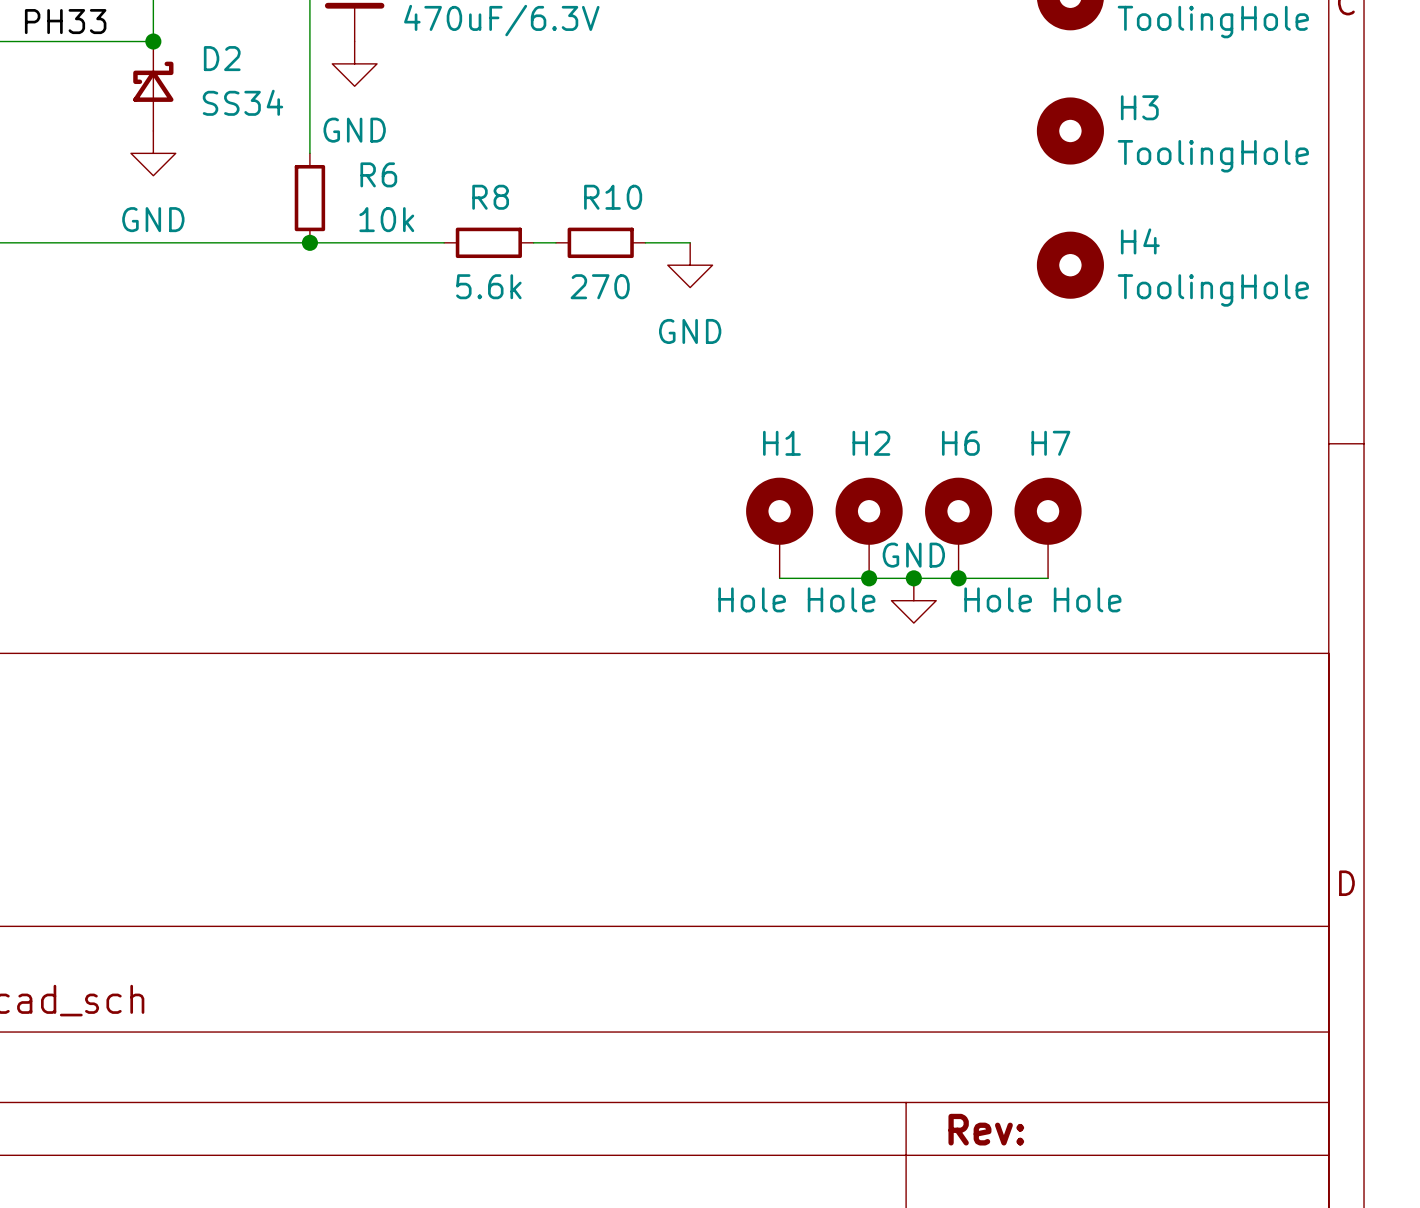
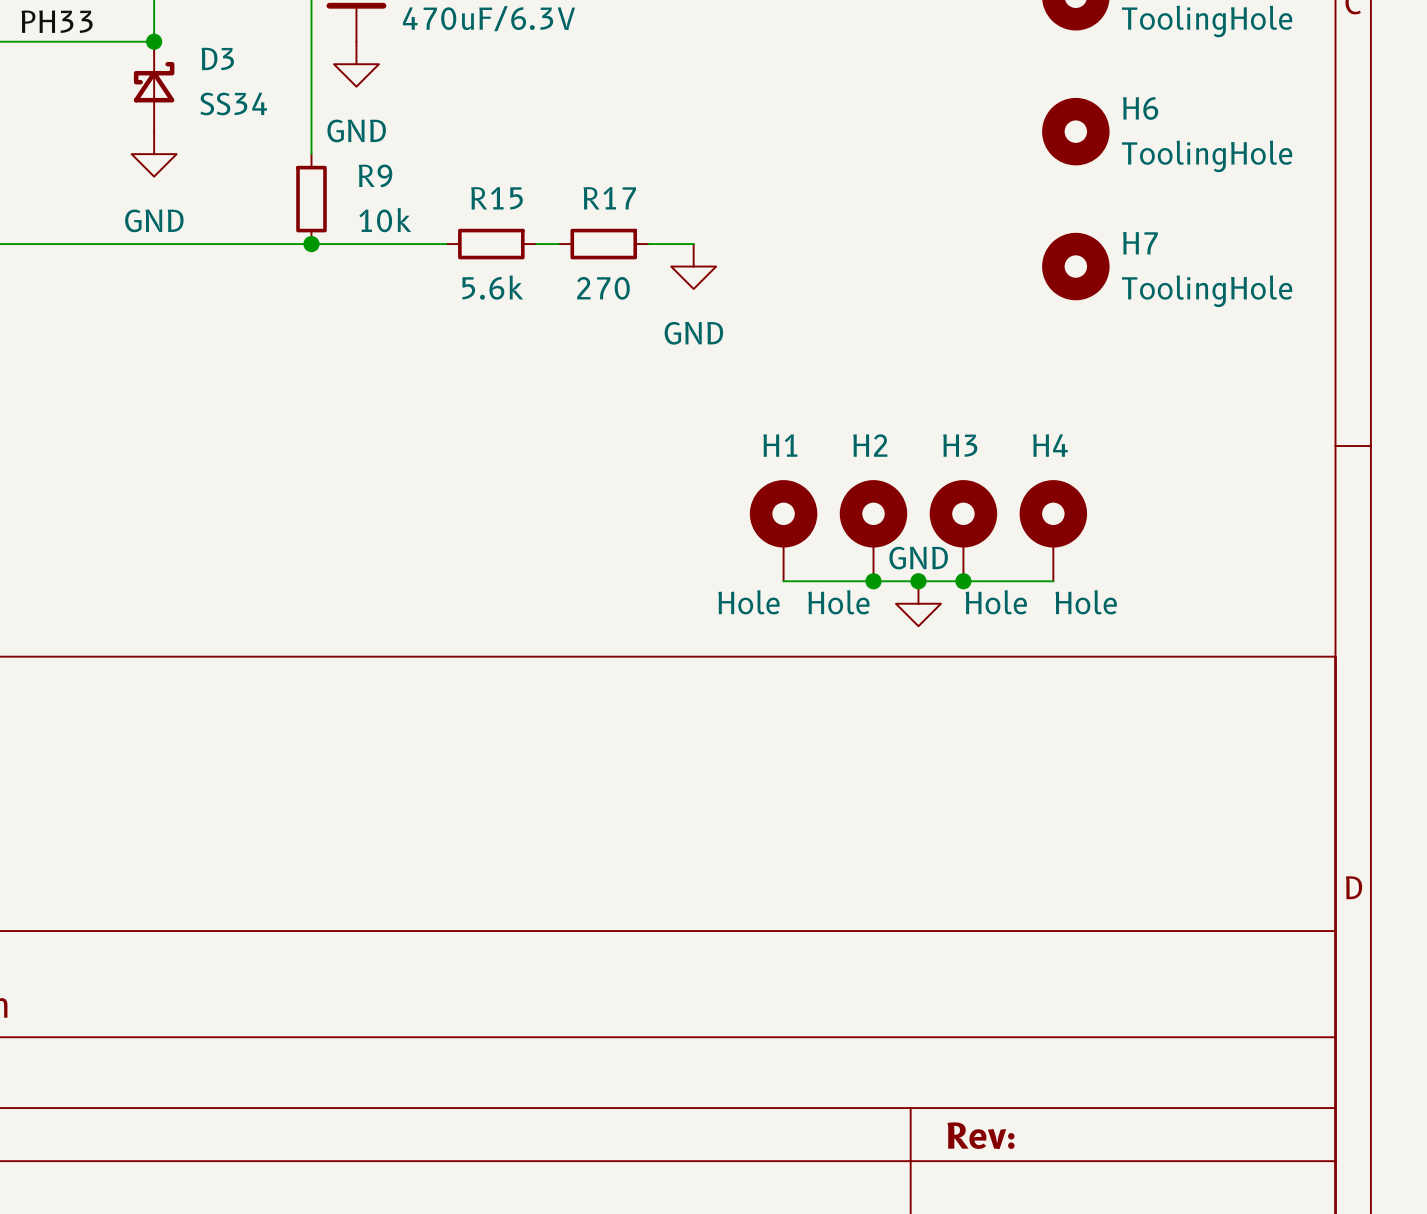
D2 name: D2 (222, 58) -> D3 (217, 58)
H3 name: H3 (1139, 107) -> H6 (1140, 108)
R6 name: R6 (378, 174) -> R9 (375, 175)
R8 name: R8 (490, 197) -> R15 (496, 198)
R10 name: R10 (613, 197) -> R17 (609, 198)
H4 name: H4 (1140, 241) -> H7 (1140, 243)
H6 name: H6 (960, 443) -> H3 (960, 445)
H7 name: H7 (1050, 443) -> H4 (1050, 445)

